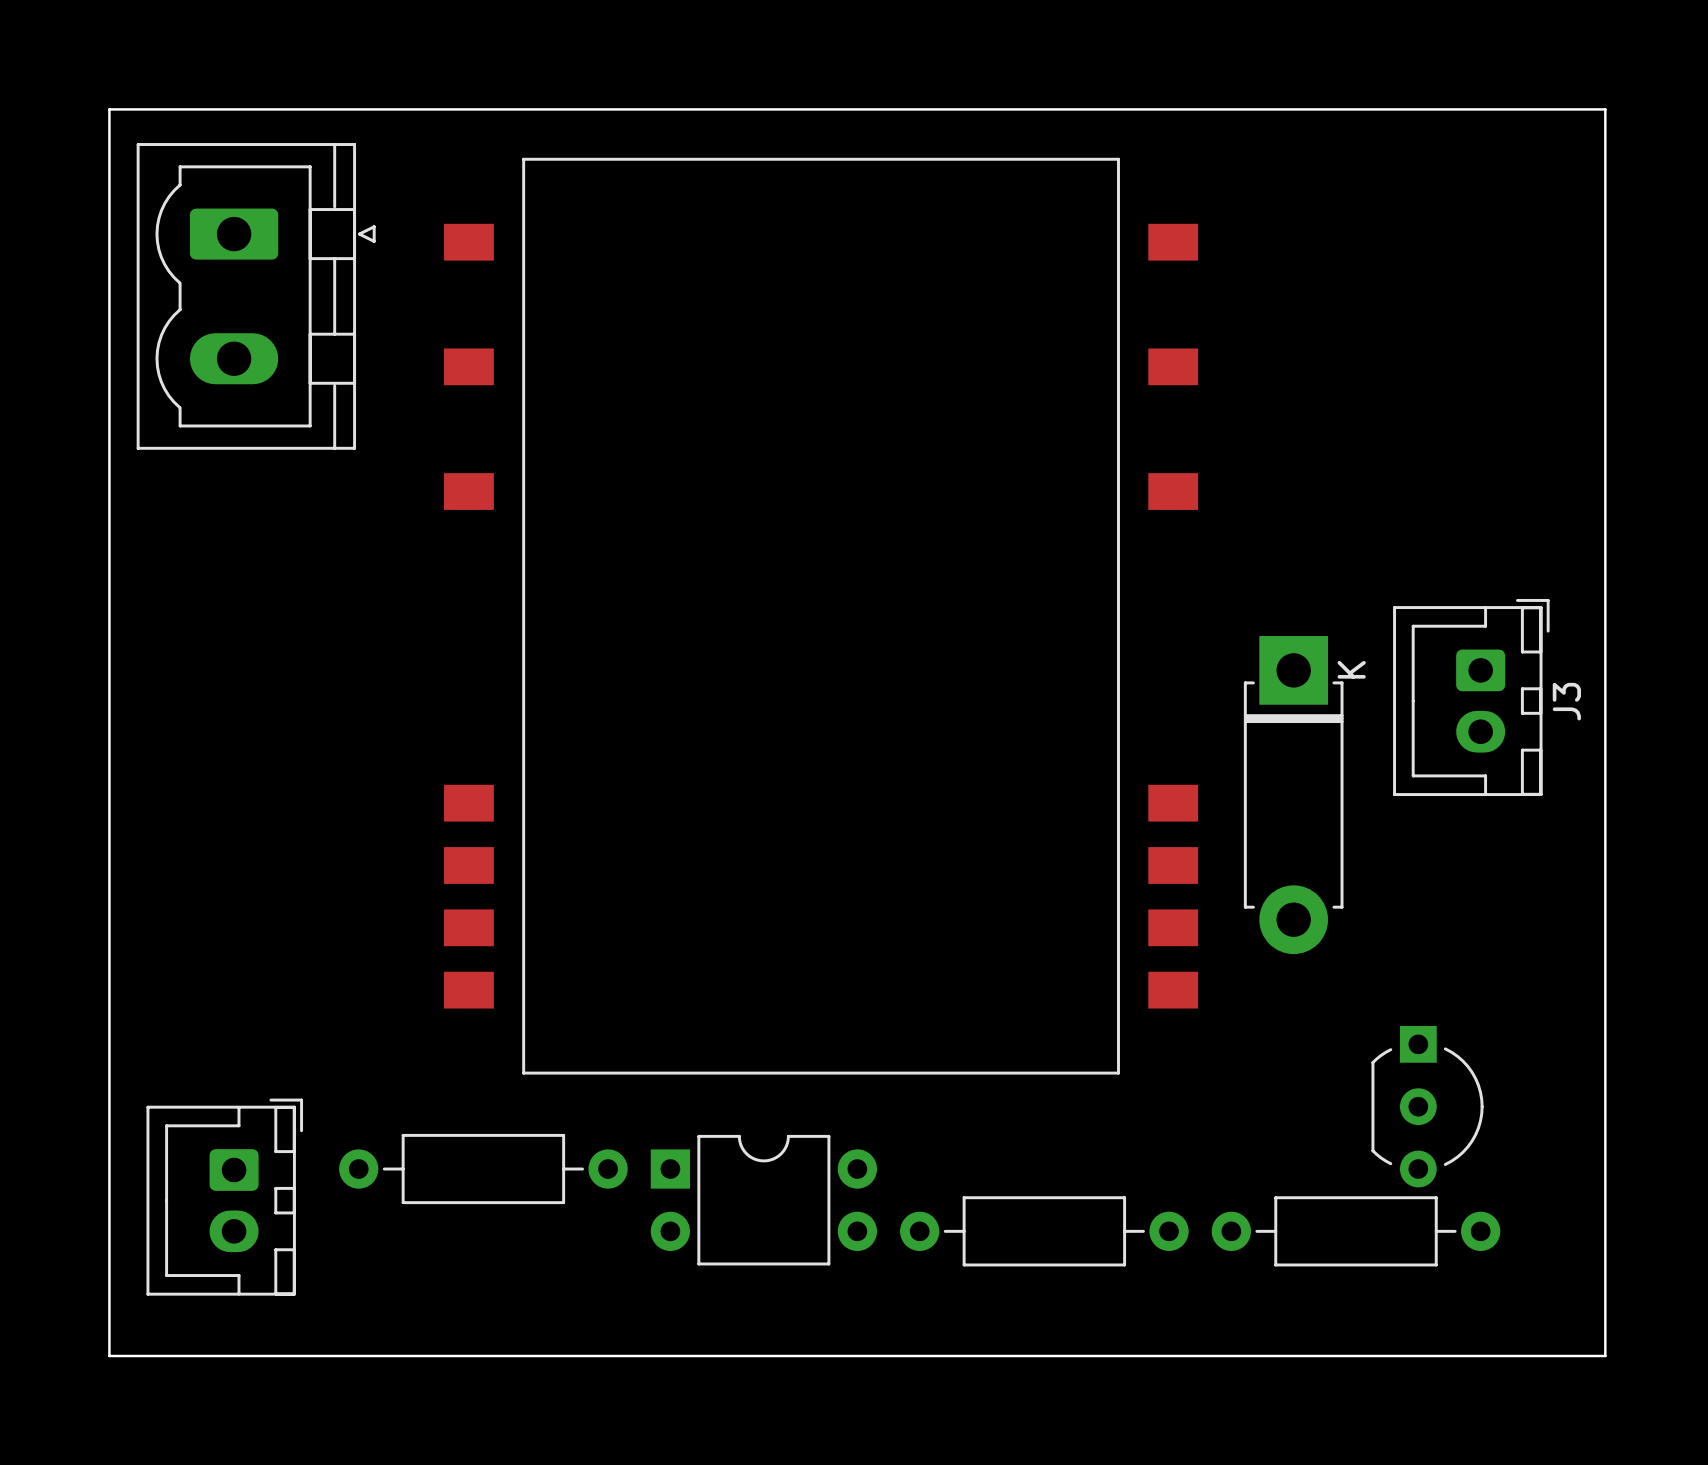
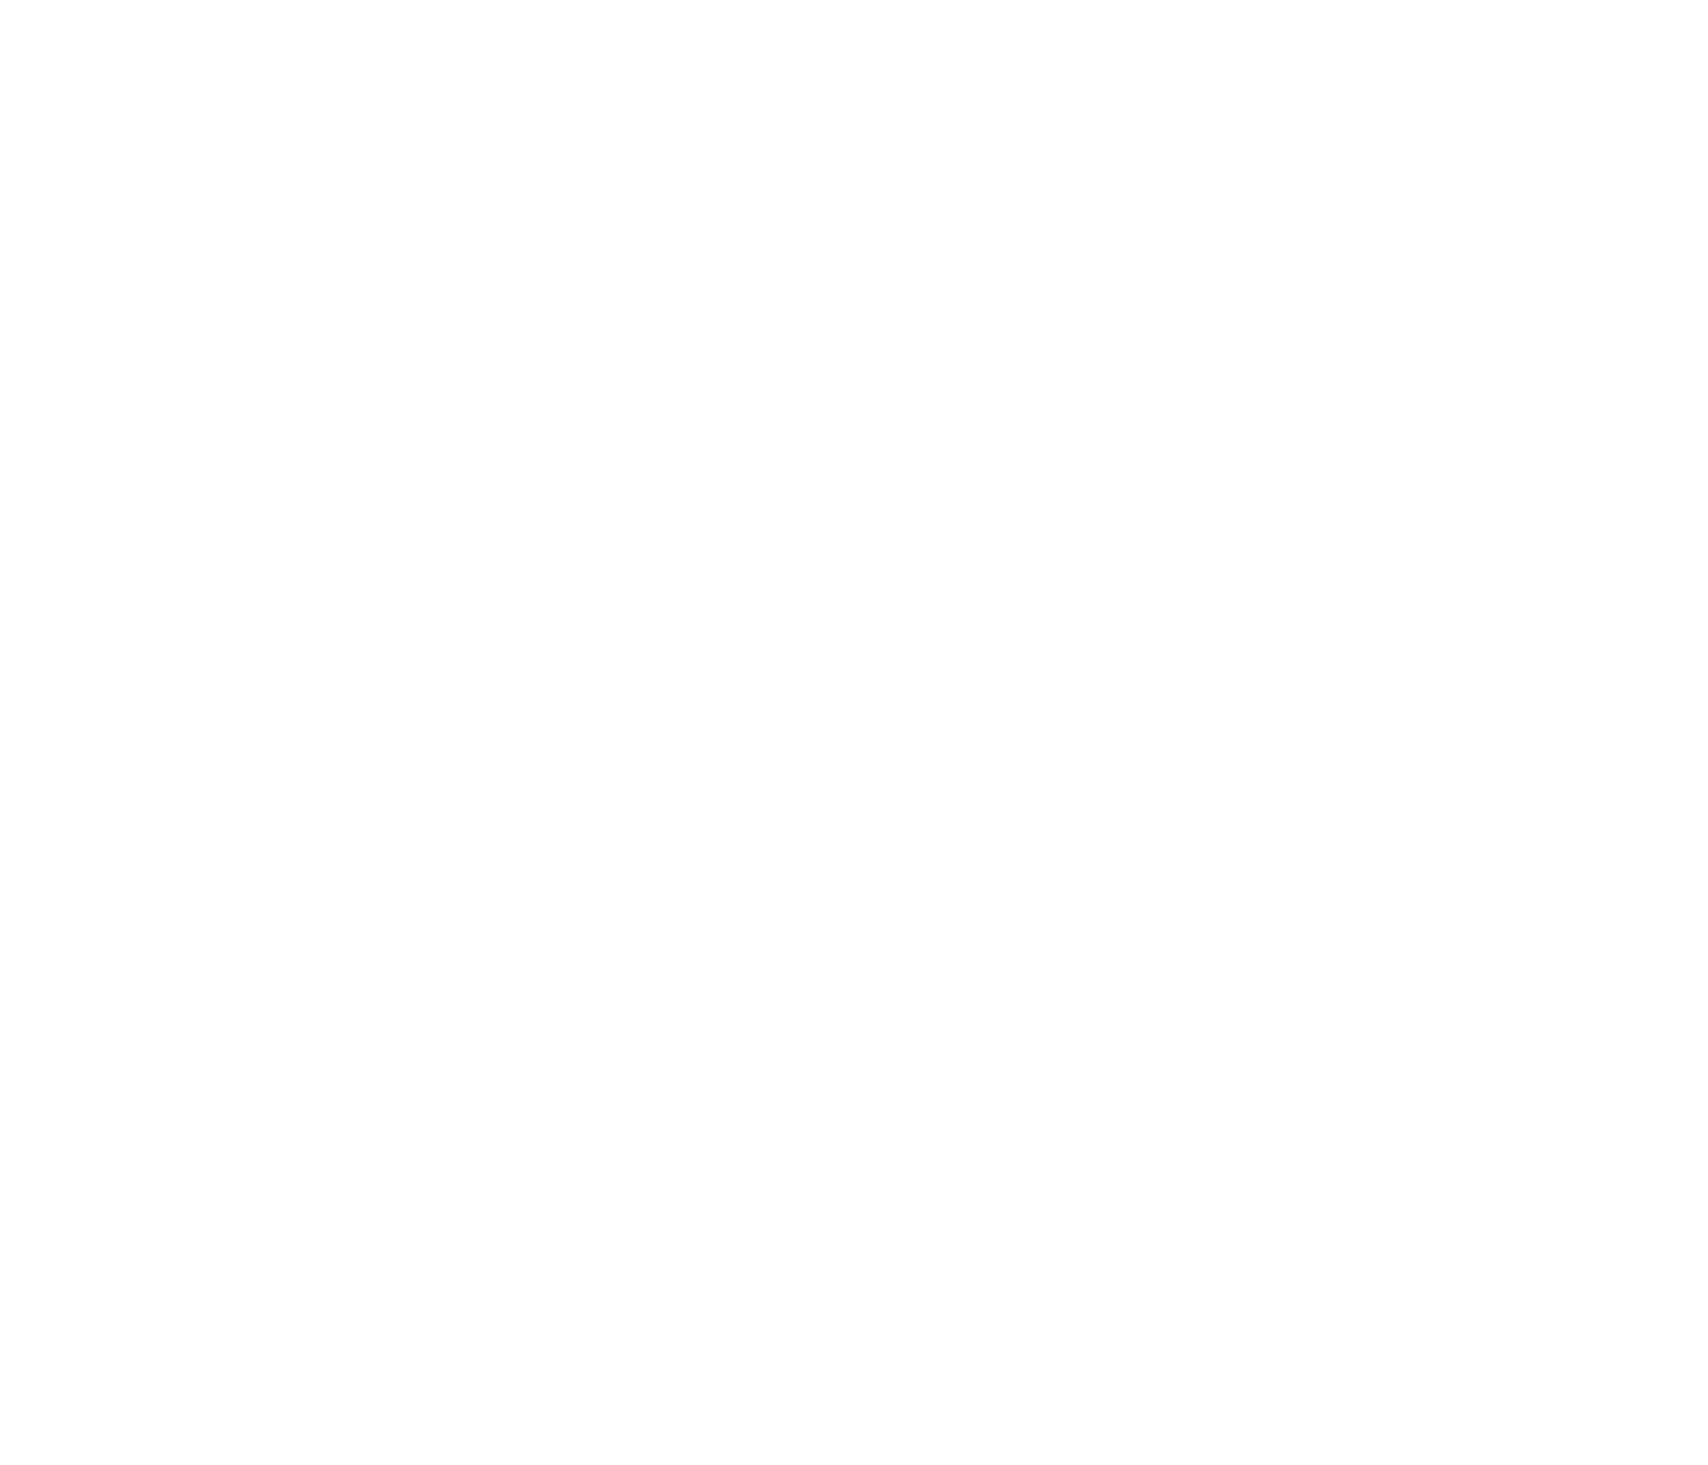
board edge: (109, 109) (1605, 109) (1605, 1356) (109, 1356) (109, 109) -> none
part: (256, 296) -> none
part: (821, 616) -> none
J3: (1471, 697) -> none
part: (1293, 795) -> none
part: (1427, 1106) -> none
part: (483, 1169) -> none
part: (224, 1197) -> none
part: (763, 1200) -> none
part: (1044, 1231) -> none
part: (1356, 1231) -> none

